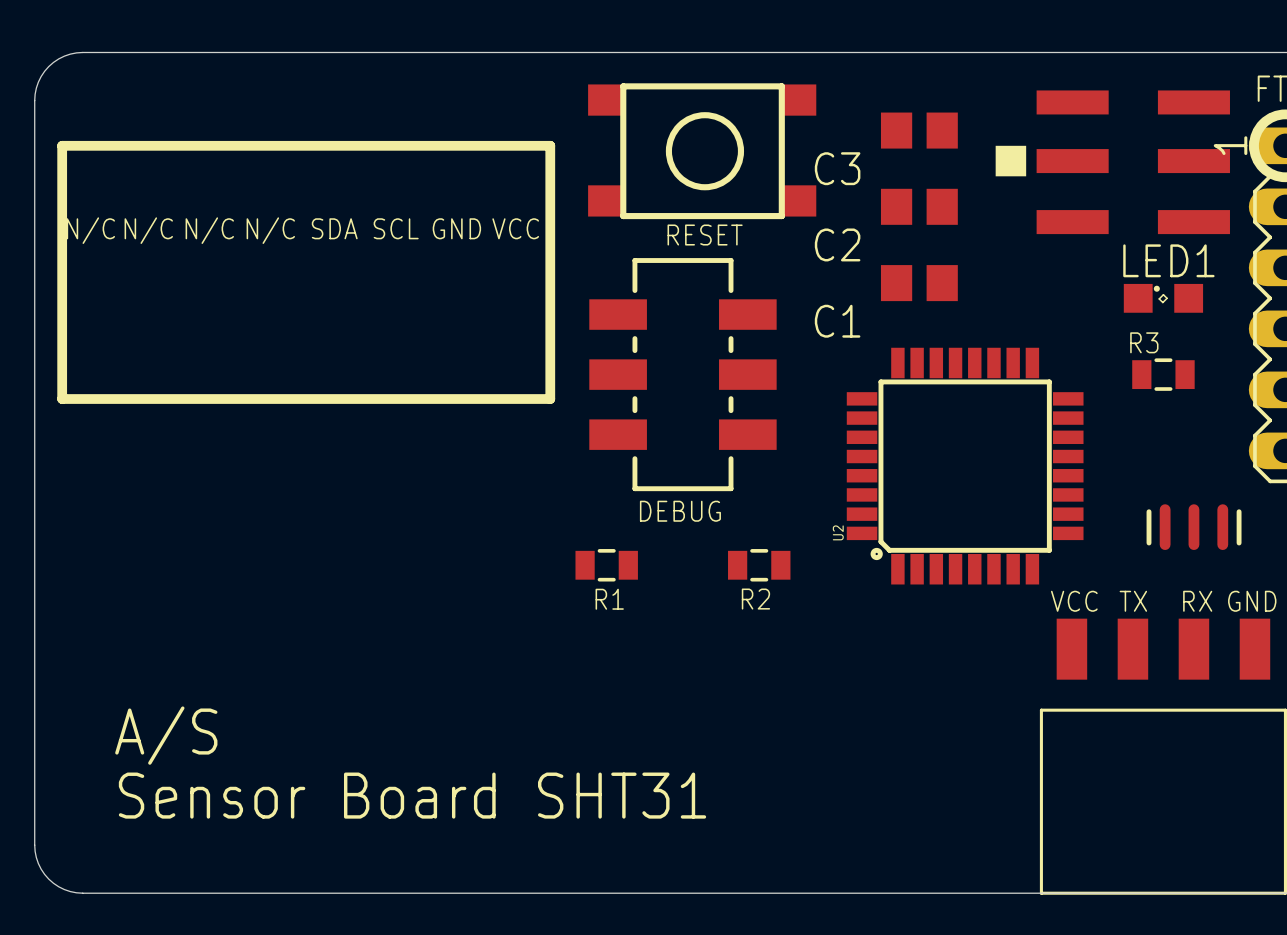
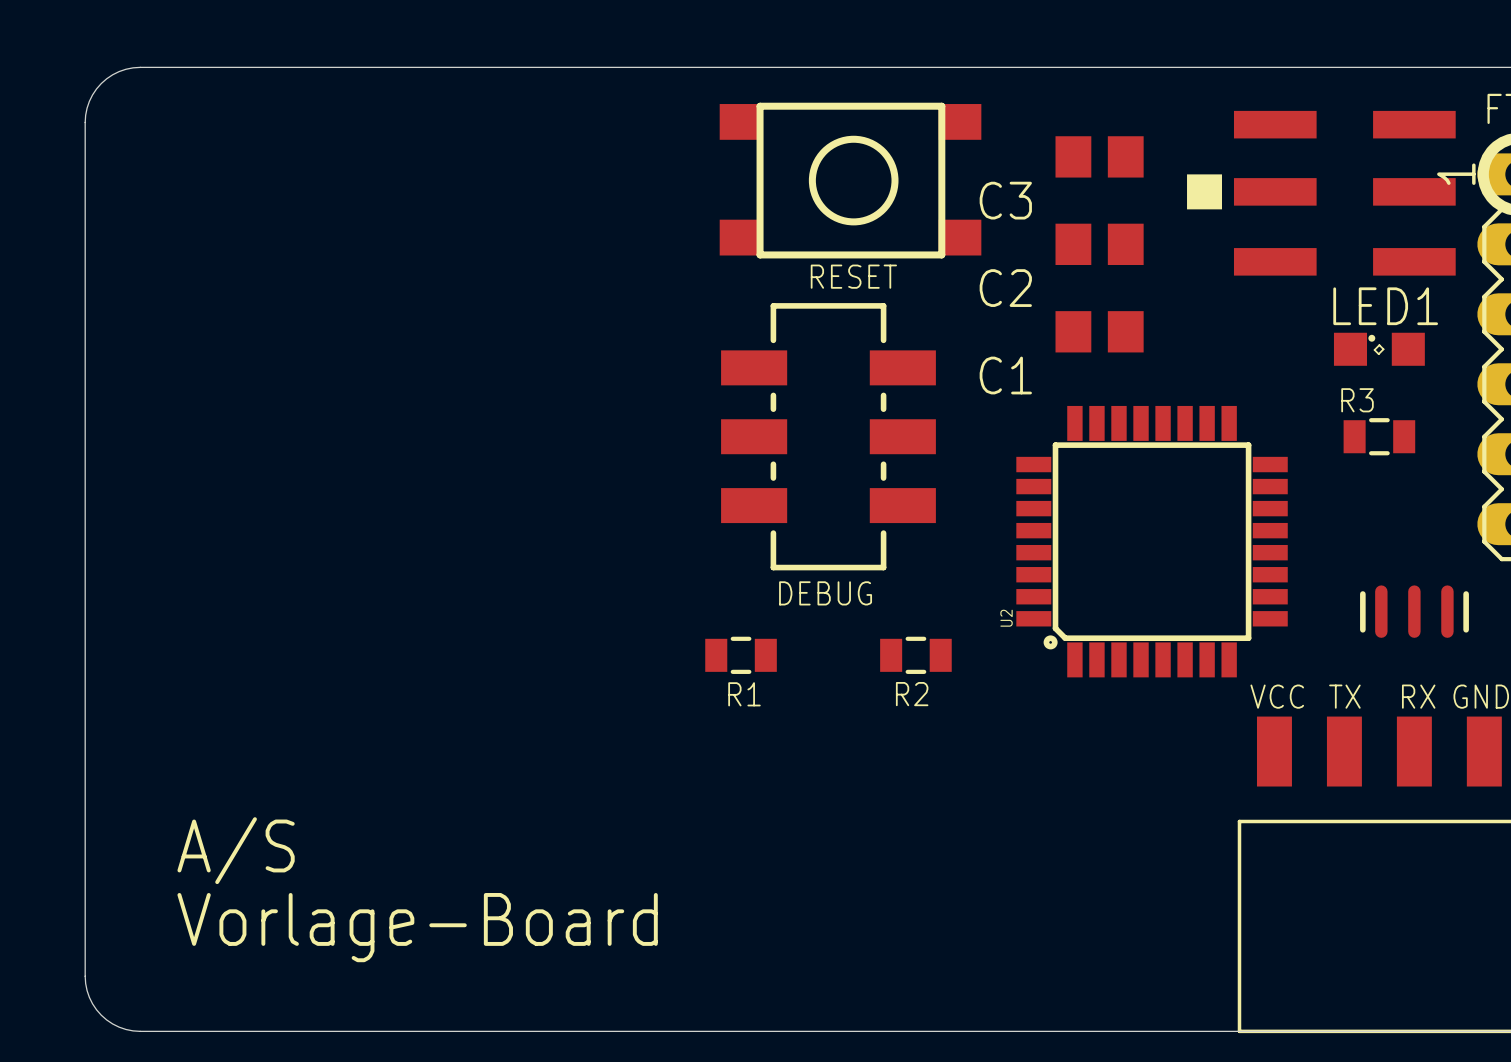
line: (62, 145) (550, 145) (550, 399) (62, 399) (62, 145) -> none
text: SDA (334, 228) -> none
text: SCL (396, 228) -> none
text: GND (456, 228) -> none
text: VCC (515, 228) -> none
text: N/C (90, 230) -> none
text: N/C (148, 230) -> none
text: N/C (209, 230) -> none
text: N/C (270, 230) -> none
text: Sensor Board SHT31 (412, 795) -> Vorlage-Board (417, 927)

